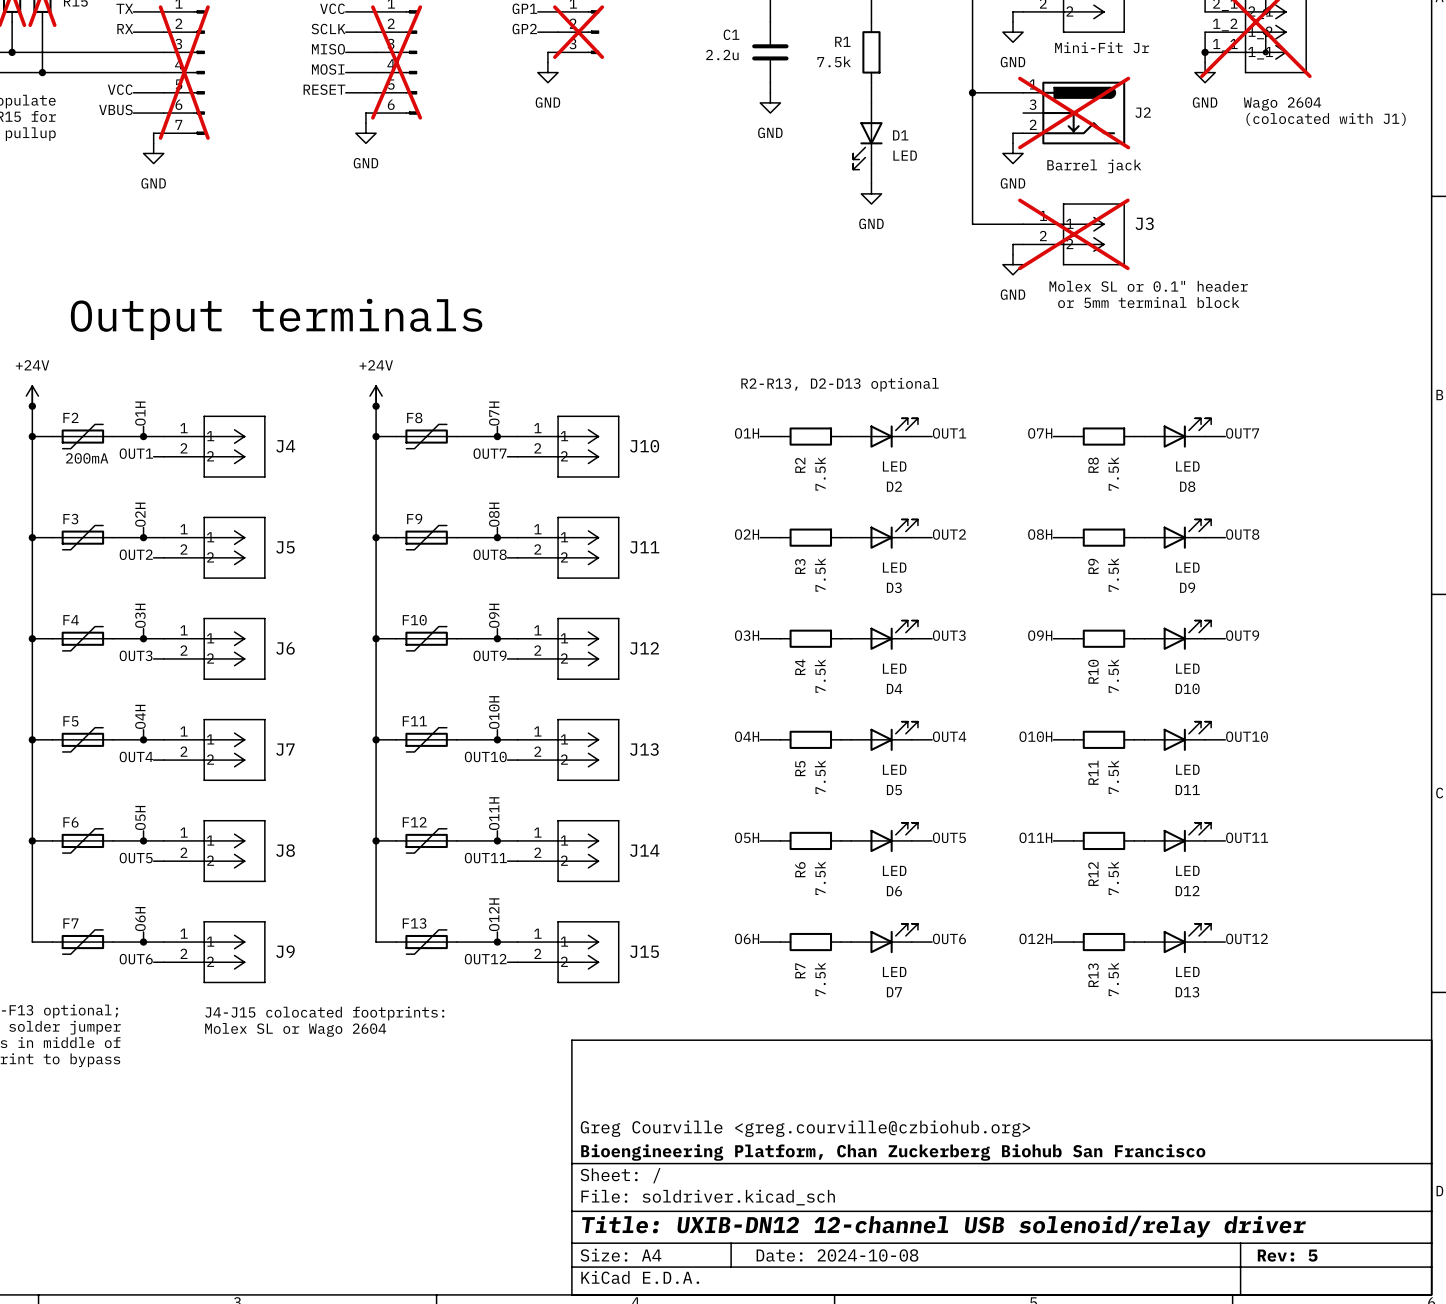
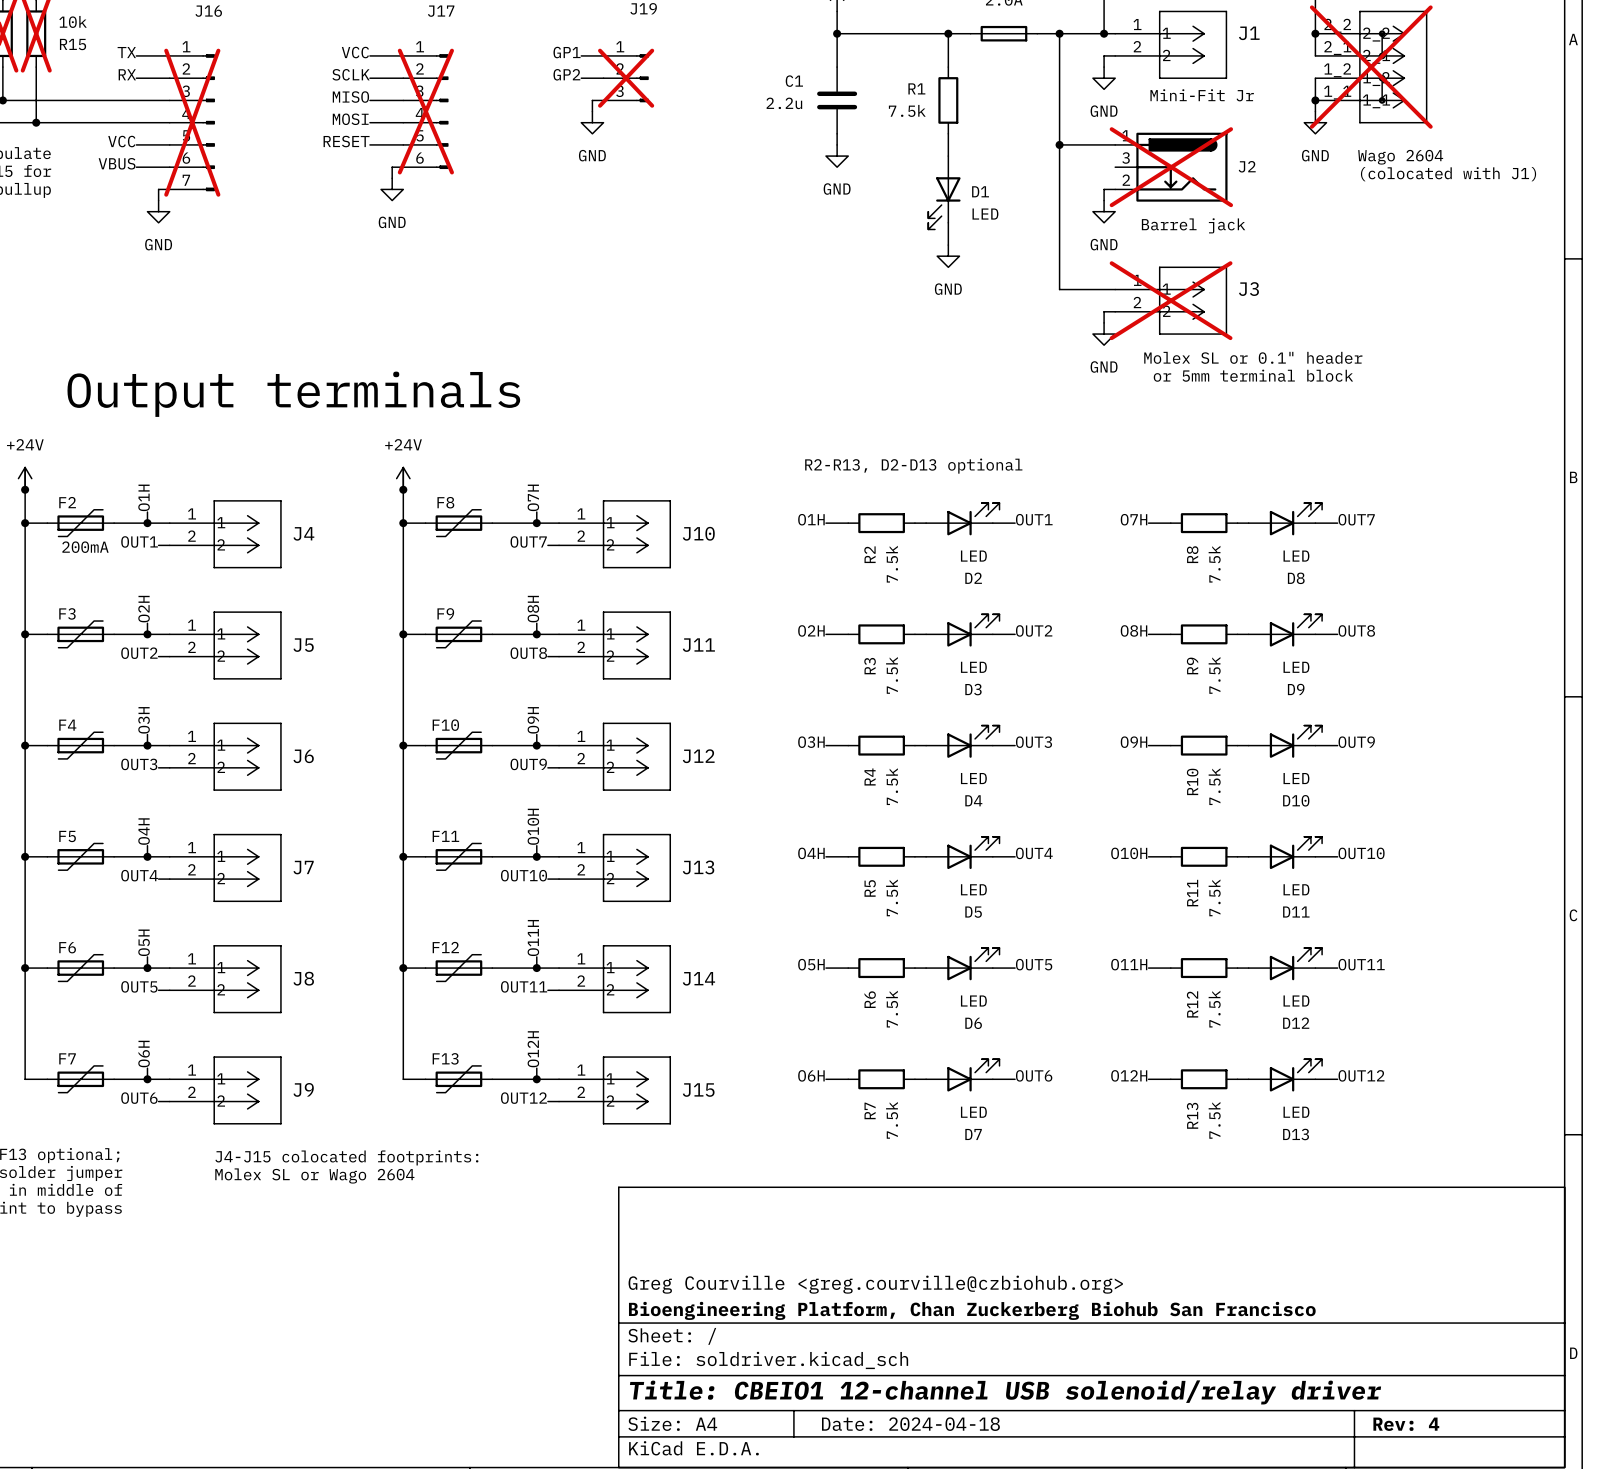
title block: Title: UXIB-DN12 12-channel USB solenoid/relay driver (943, 1226) -> Title: CBEIO1 12-channel USB solenoid/relay driver (1005, 1392)
title block: Date: 2024-10-08 (837, 1255) -> Date: 2024-04-18 (910, 1424)
title block: Rev: 5 (1287, 1255) -> Rev: 4 (1406, 1424)

